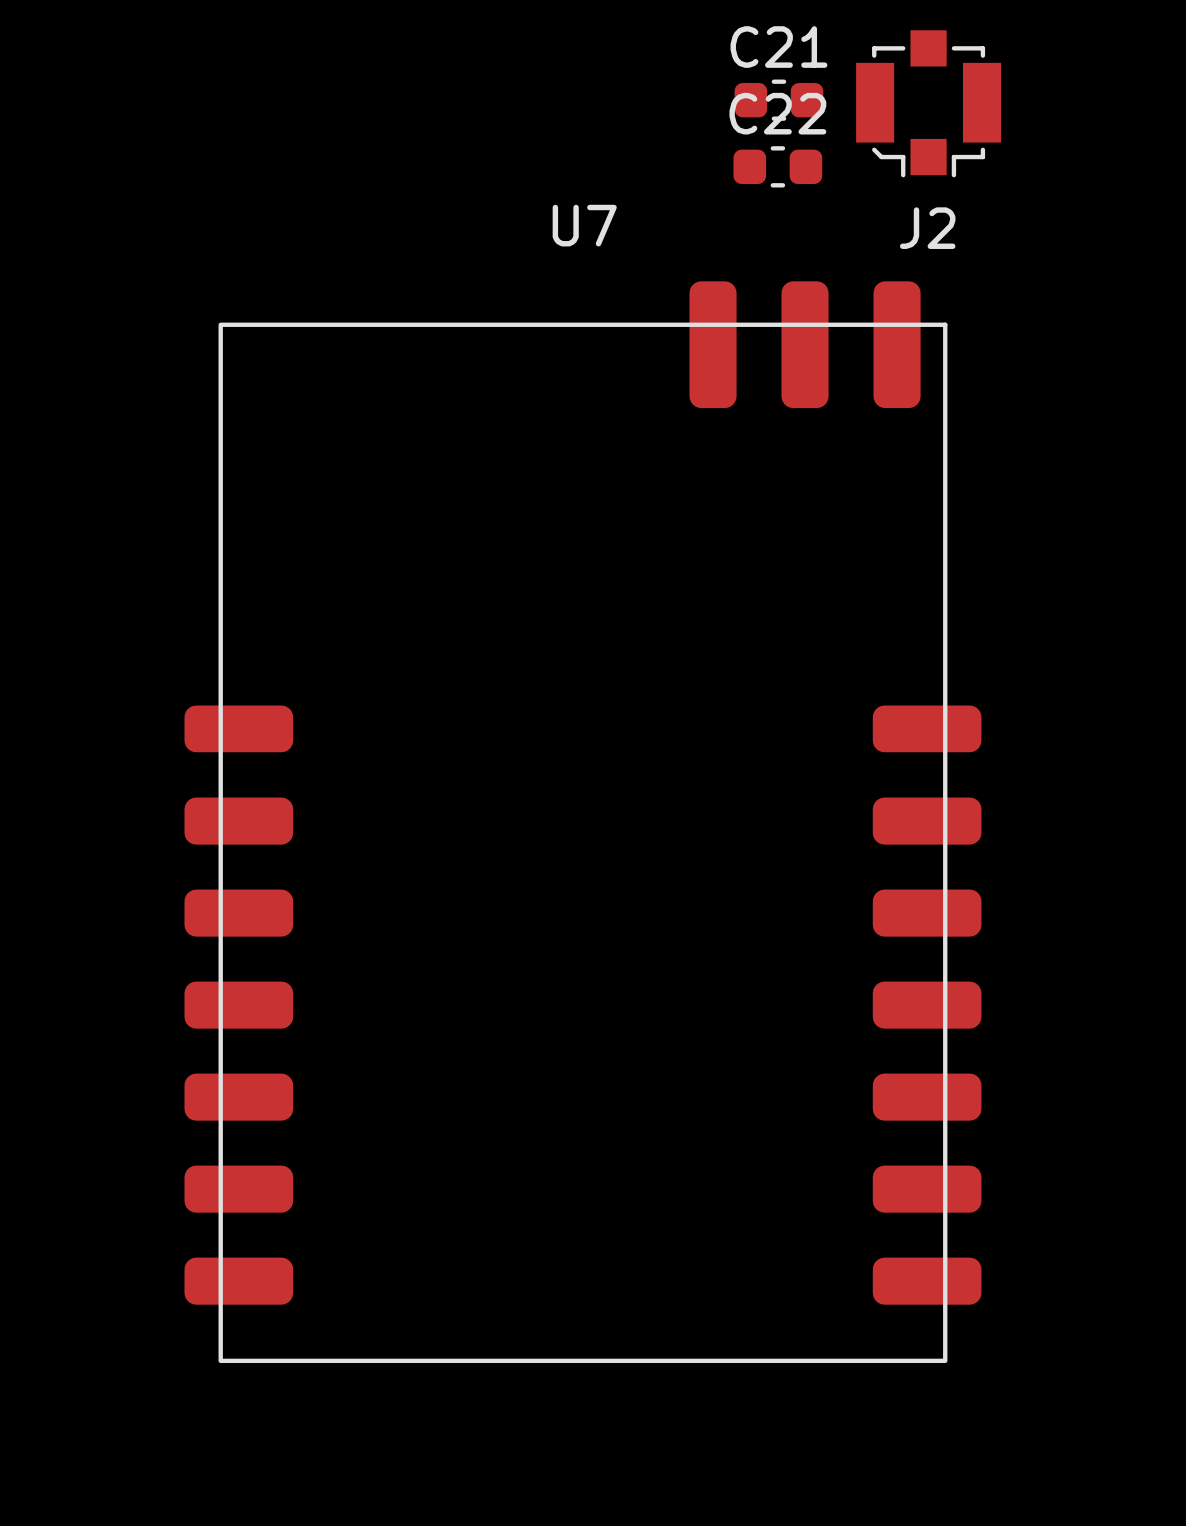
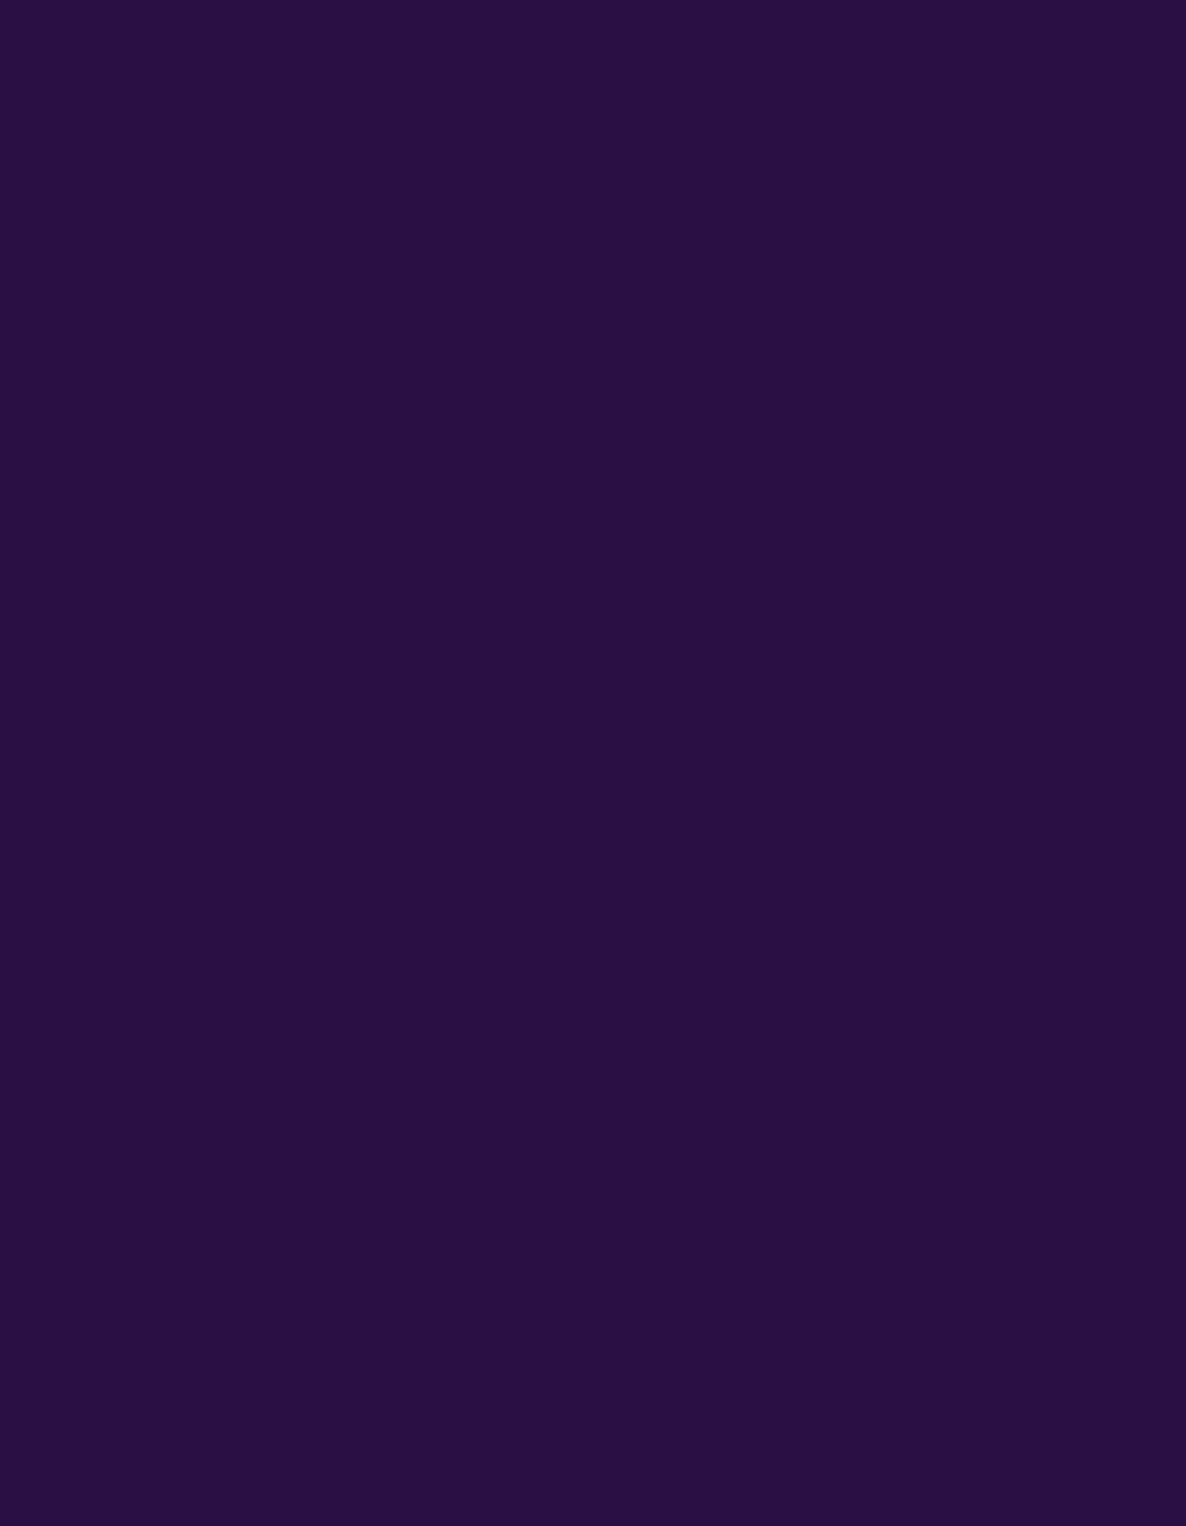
C21: (778, 100) -> none
J2: (928, 103) -> none
C22: (777, 166) -> none
U7: (582, 822) -> none

